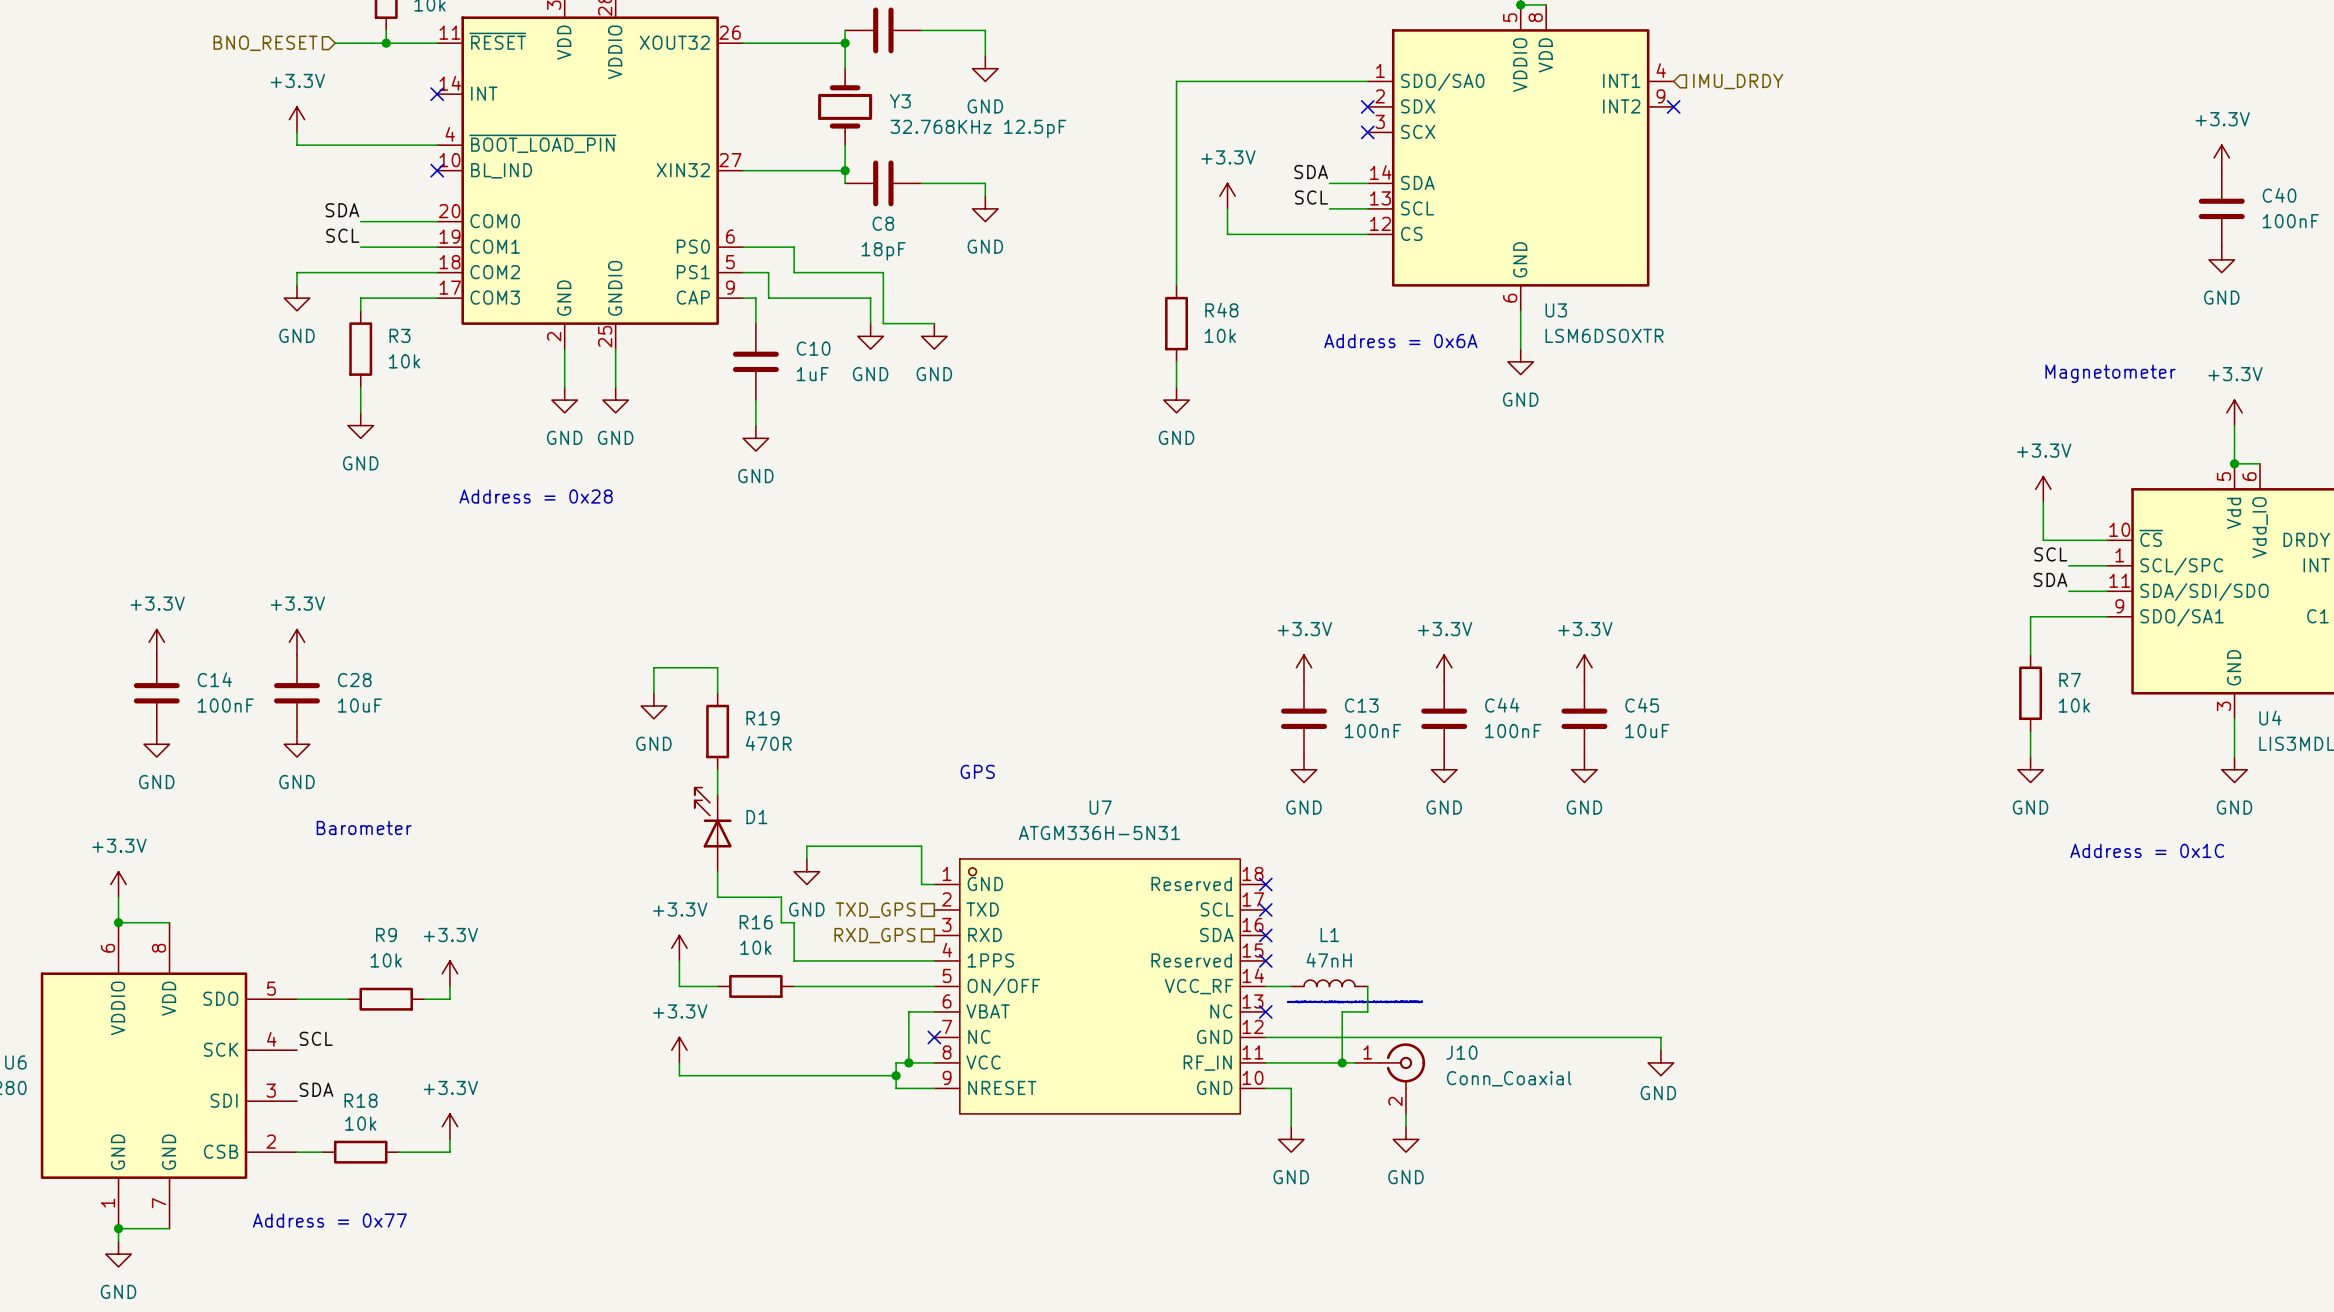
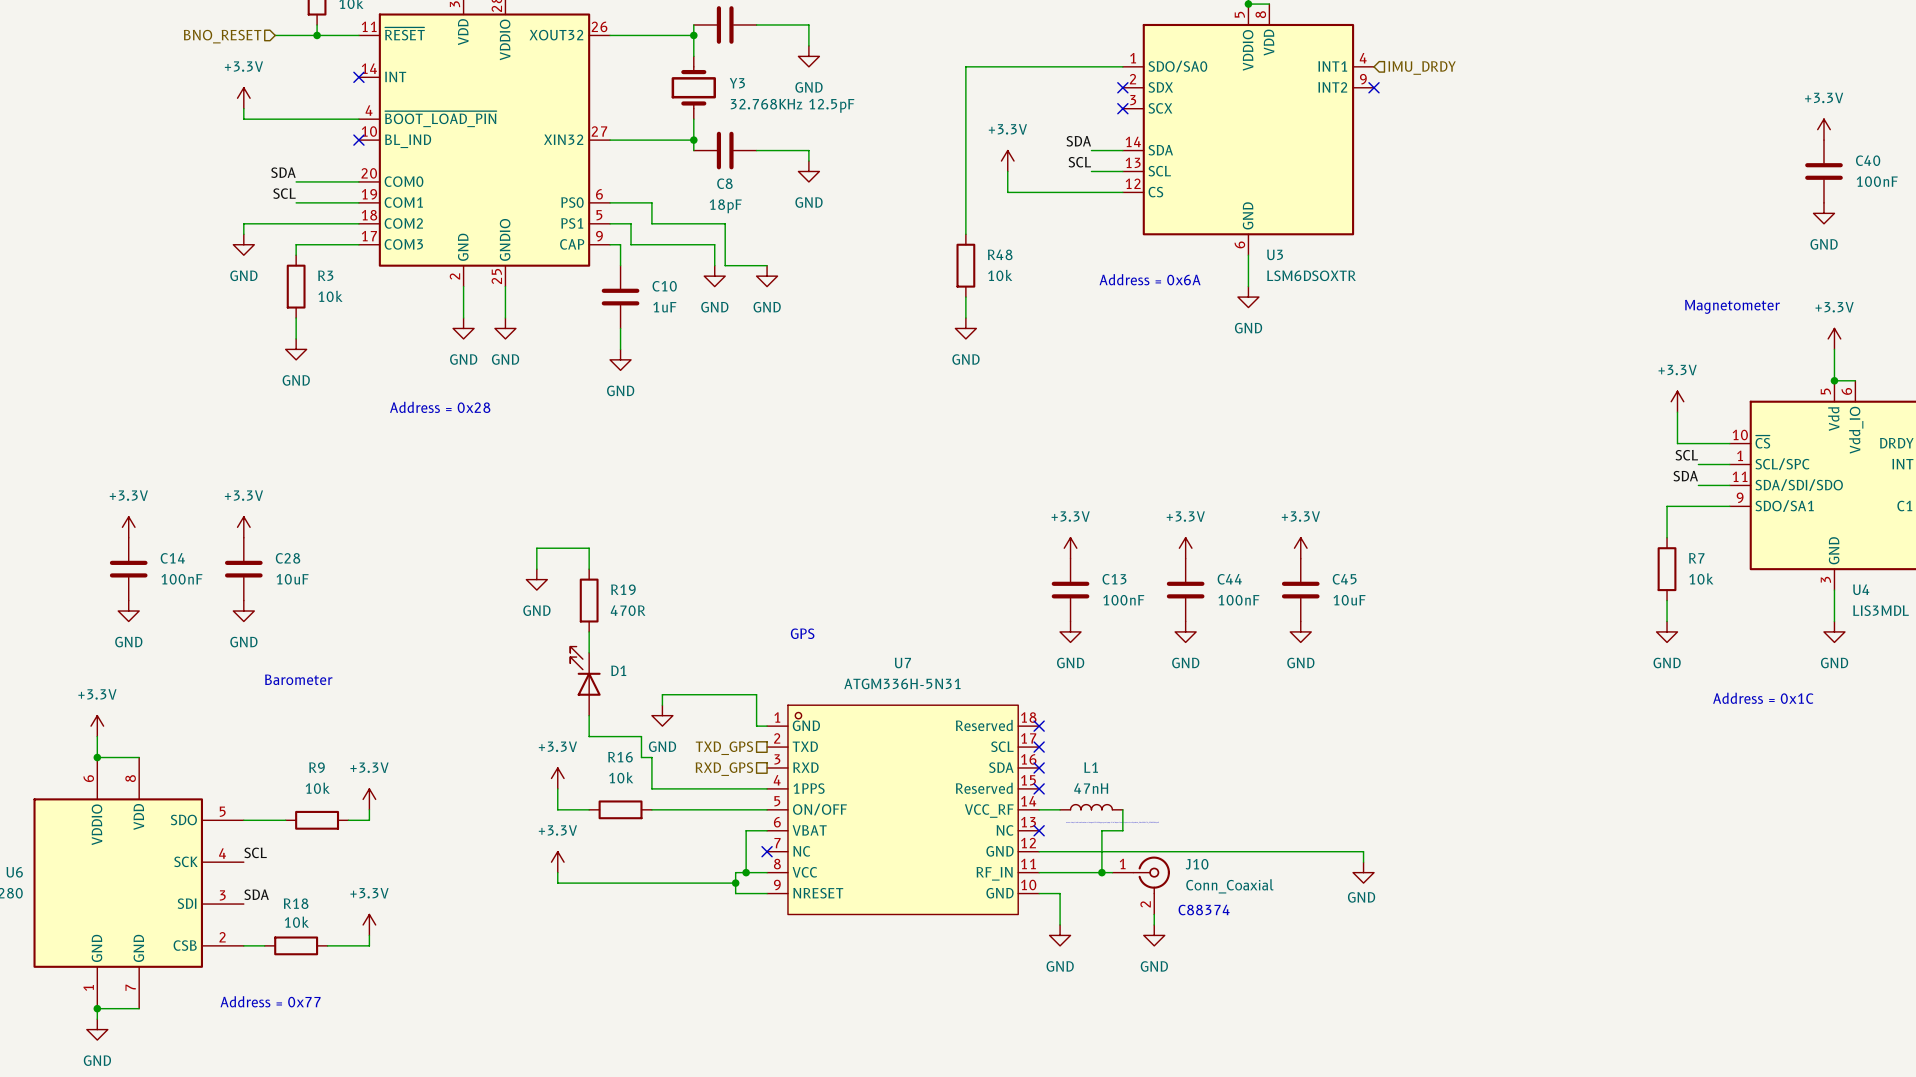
text: none -> C88374 (1204, 910)

